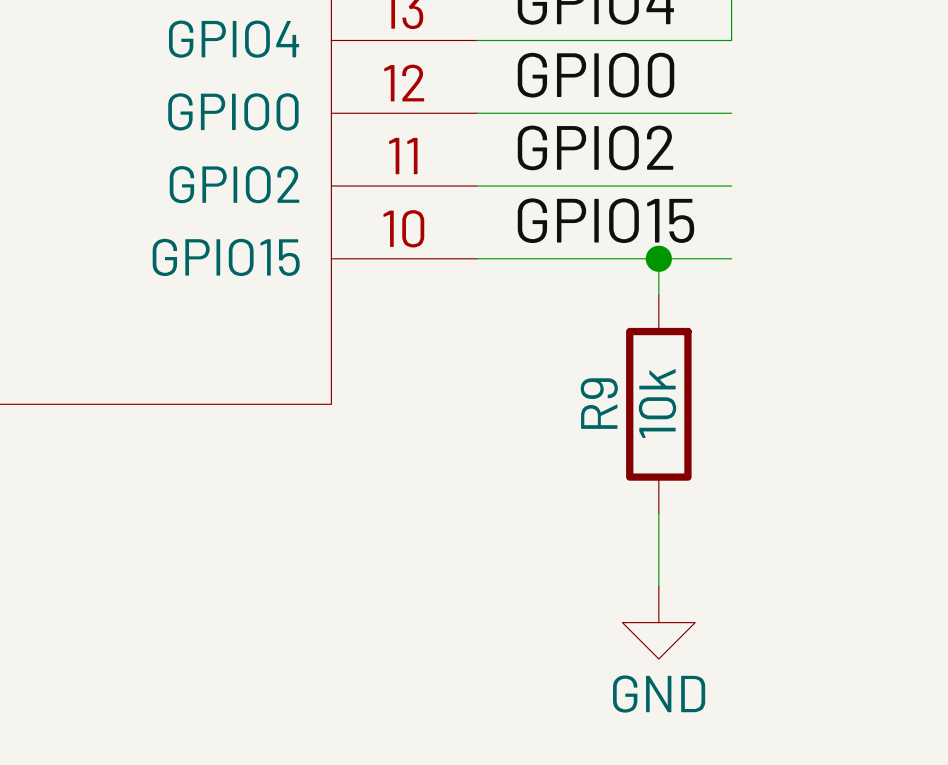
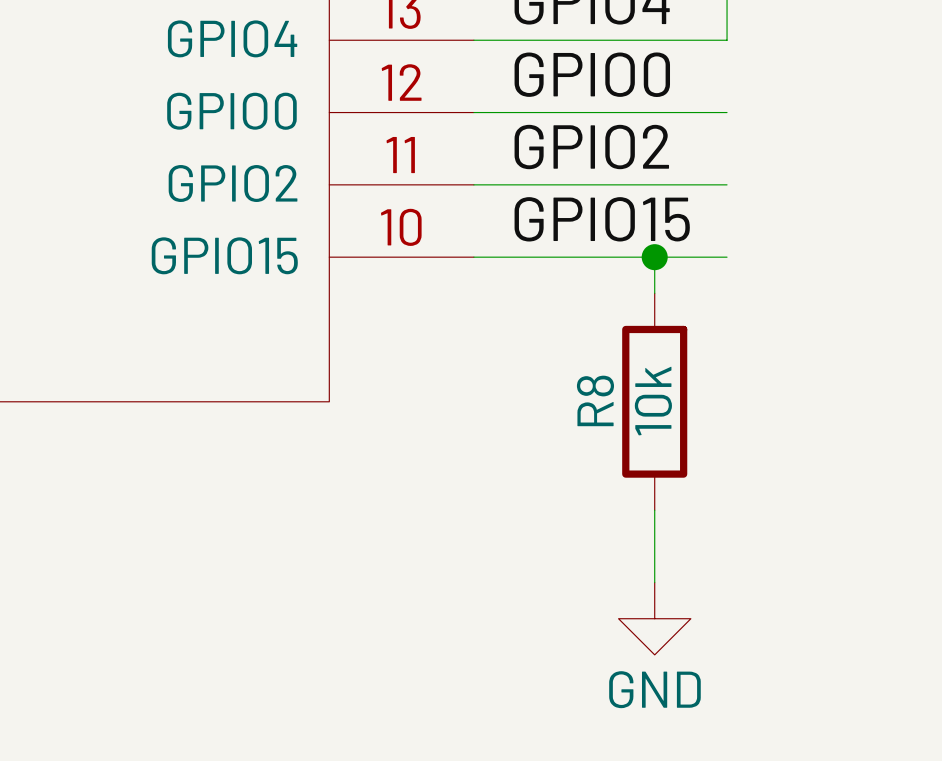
R9 name: R9 (599, 403) -> R8 (595, 400)

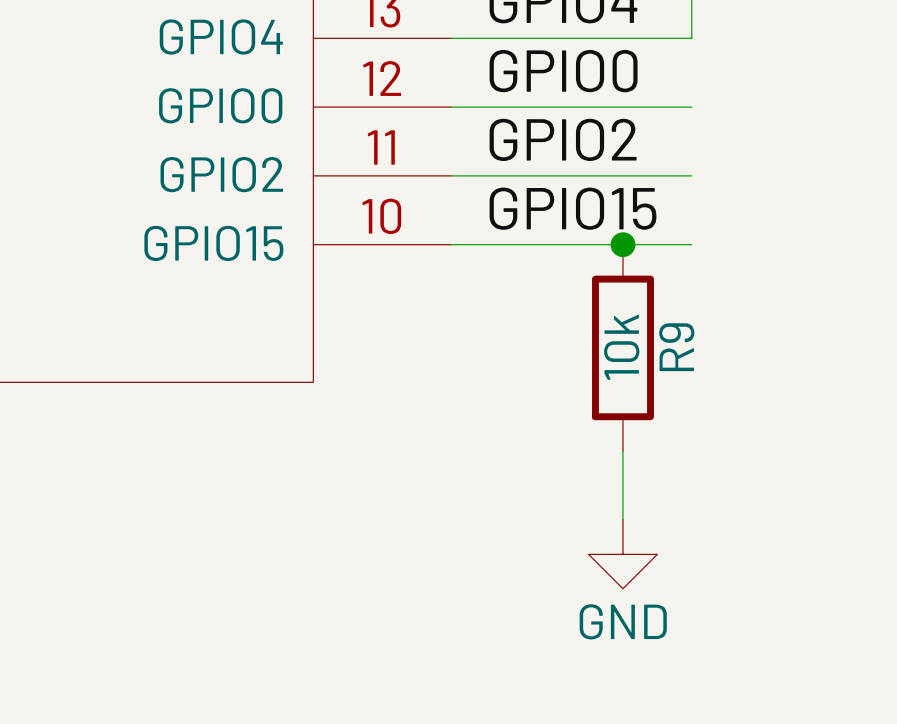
R9: none -> 10k (622, 347)
R8: 10k (654, 401) -> none
power symbol position: GND (654, 618) -> GND (622, 554)

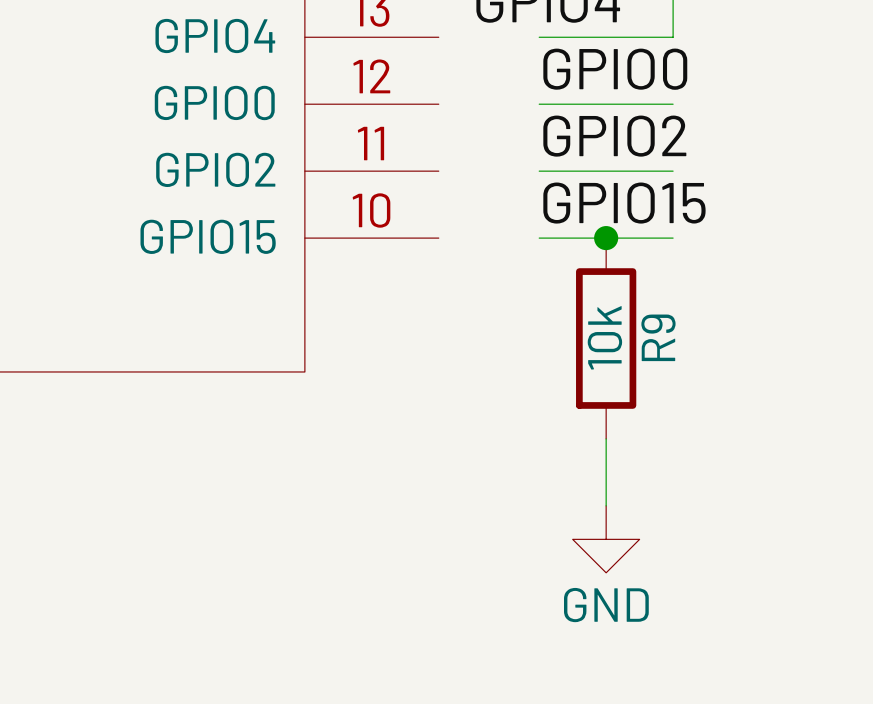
wire: (450, 38) (554, 38) -> none
label position: GPIO0 (563, 71) -> GPIO0 (615, 69)
wire: (450, 107) (554, 107) -> none
label position: GPIO2 (563, 139) -> GPIO2 (614, 136)
wire: (450, 175) (554, 175) -> none
label position: GPIO15 (573, 208) -> GPIO15 (624, 203)
wire: (450, 244) (554, 244) -> none

